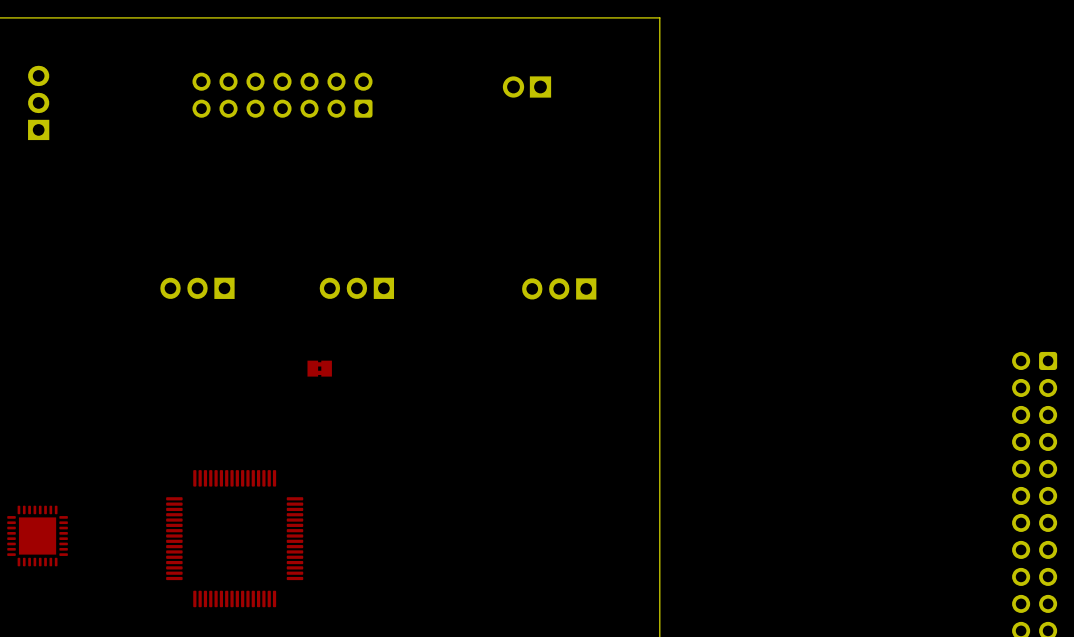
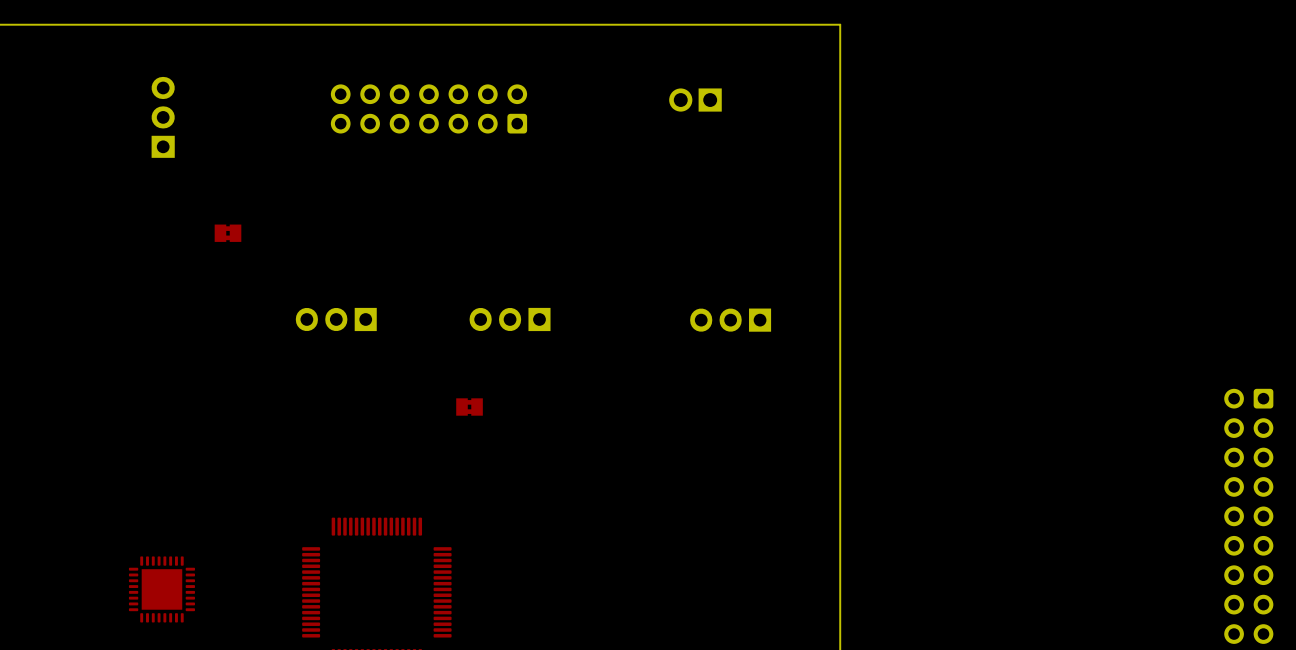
part: none -> (227, 233)

